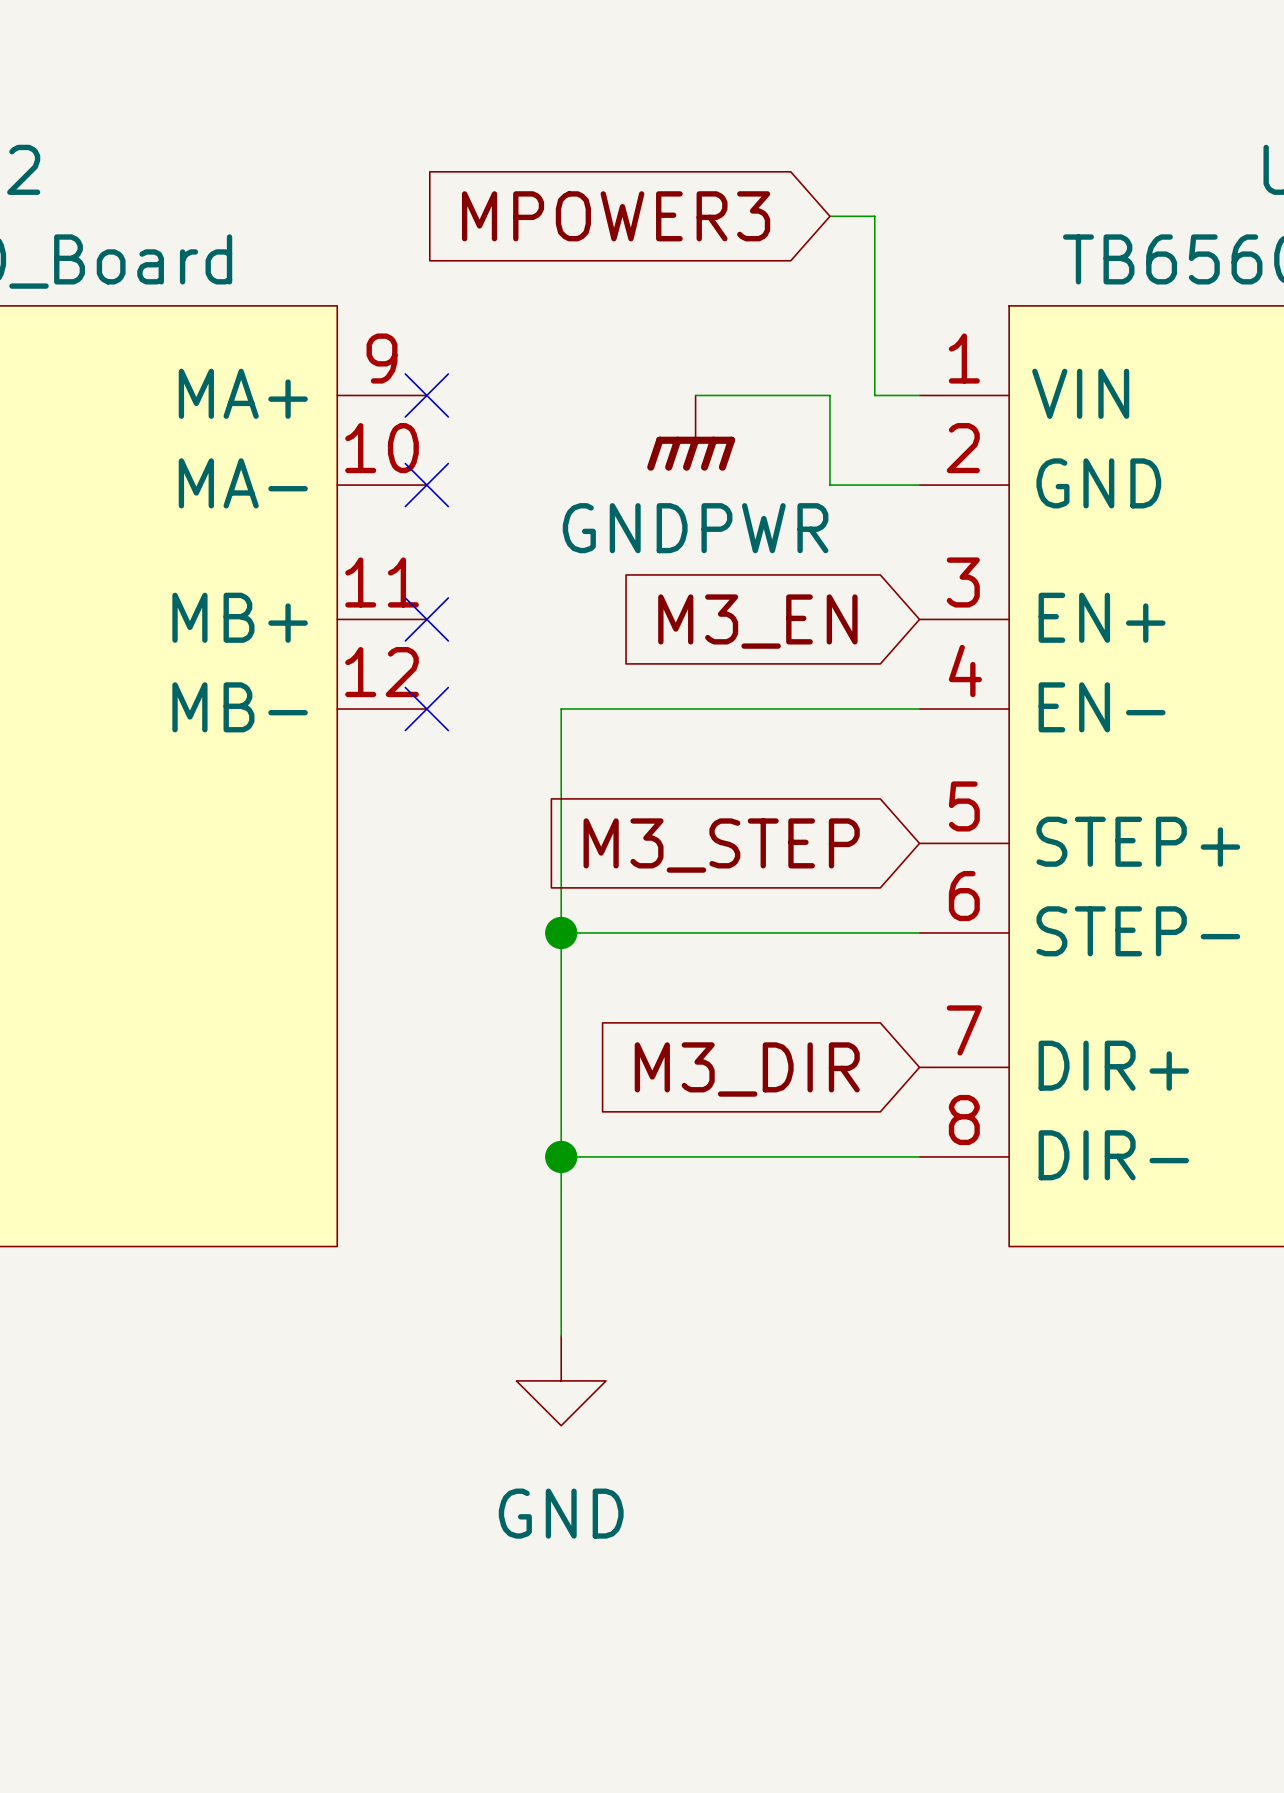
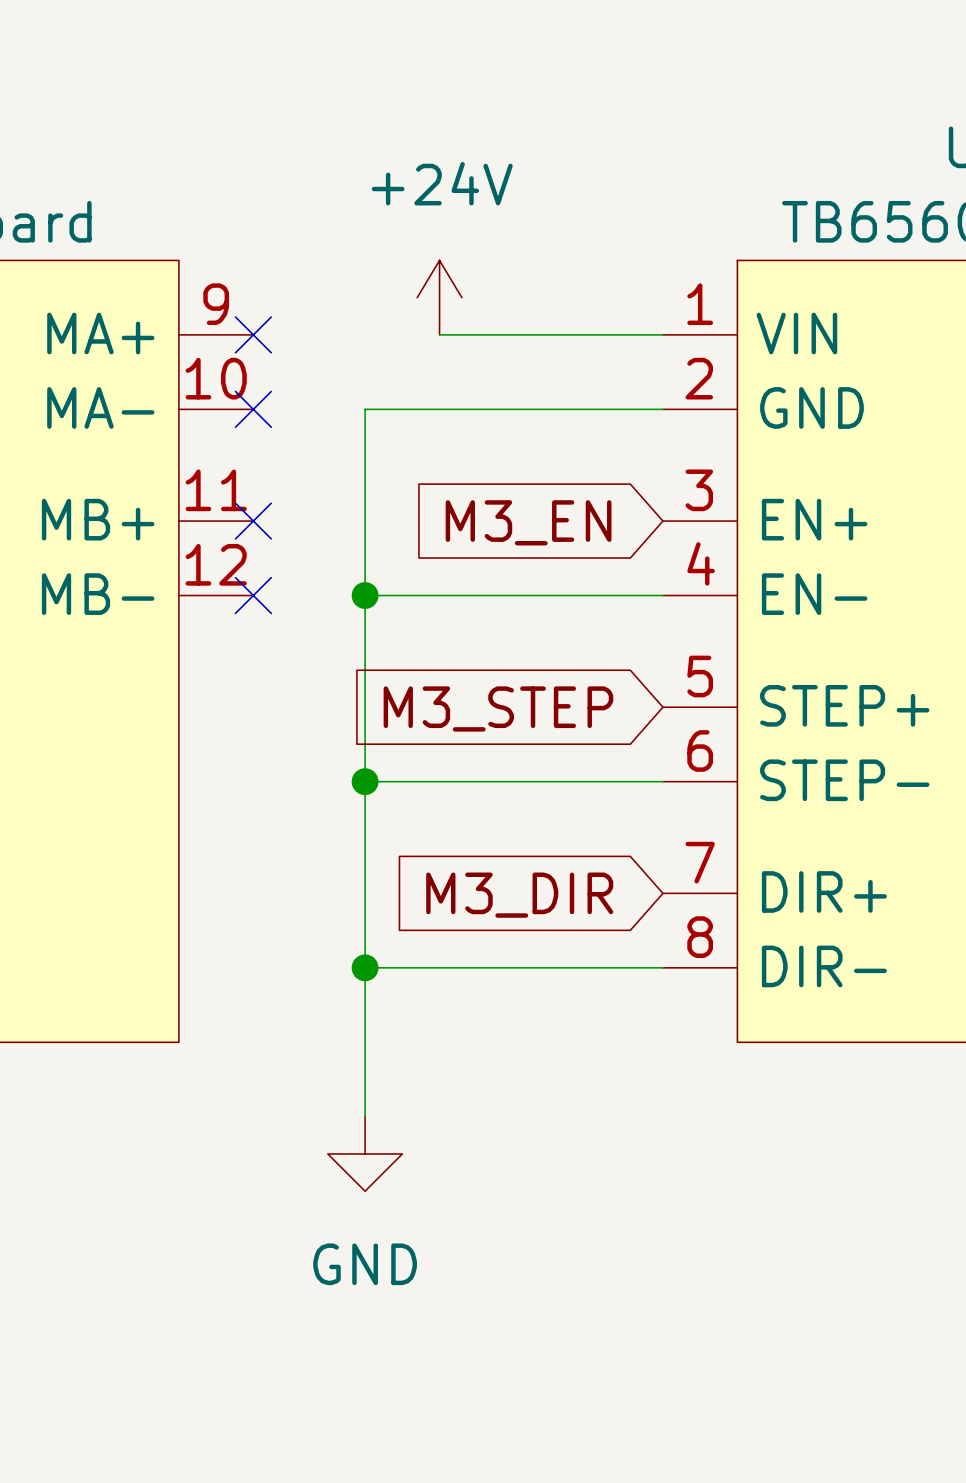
global label: MPOWER3 (616, 216) -> none
wire: (829, 216) (874, 216) (874, 395) -> none
power symbol: none -> +24V (439, 297)
wire: none -> (439, 334) (476, 334)
wire: (829, 395) (829, 485) -> (588, 334) (625, 334)
power symbol: GNDPWR (691, 433) -> none
wire: none -> (588, 409) (365, 409) (365, 595)
junction: none -> (365, 595)

